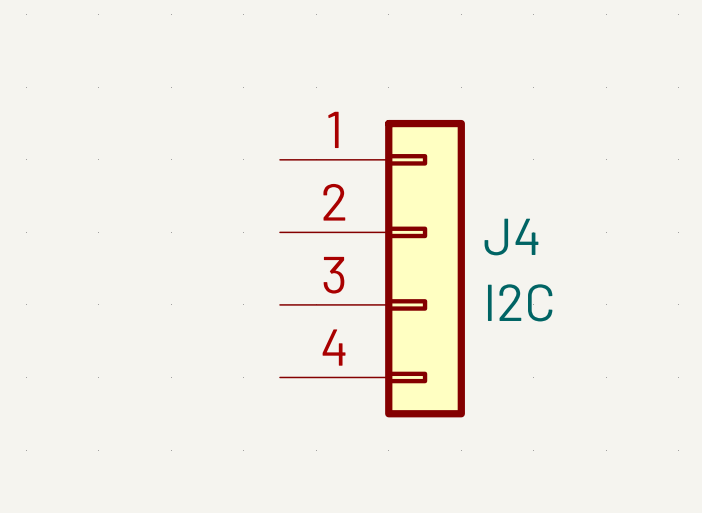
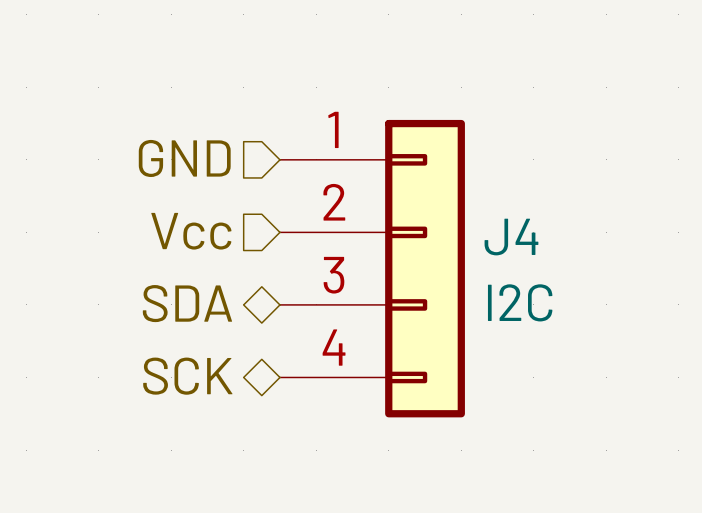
hierarchical label: none -> GND (184, 158)
hierarchical label: none -> Vcc (191, 231)
hierarchical label: none -> SDA (187, 303)
hierarchical label: none -> SCK (187, 376)

